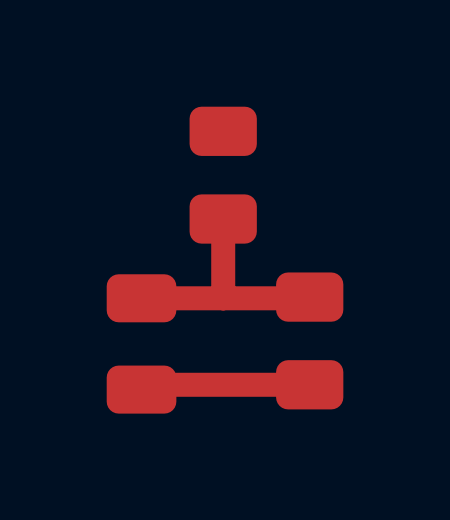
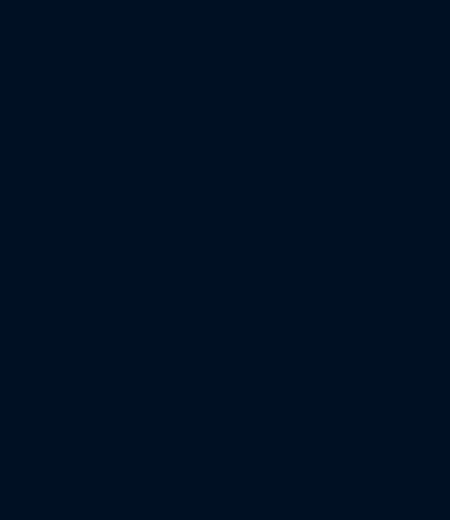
part: (223, 175) -> none
top track: (223, 219) (223, 298) -> none
top track: (309, 297) (141, 298) -> none
part: (309, 340) -> none
part: (141, 343) -> none
top track: (309, 384) (146, 384) (141, 389) -> none

